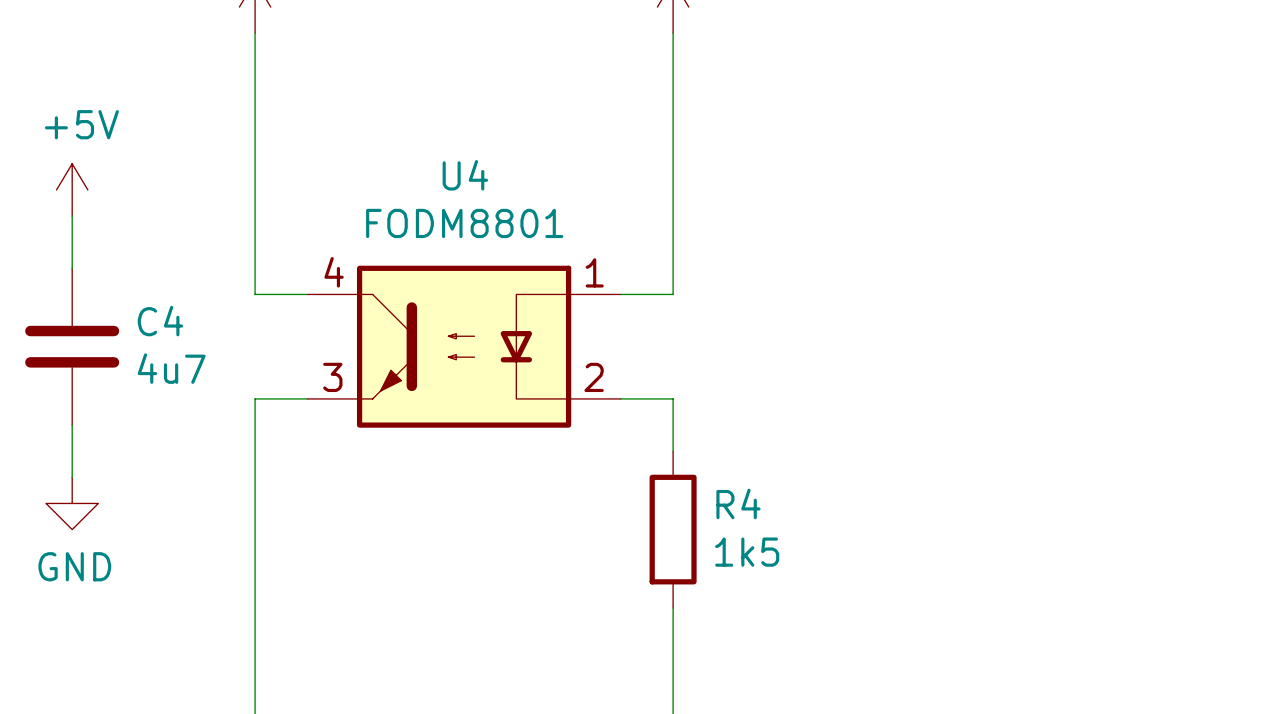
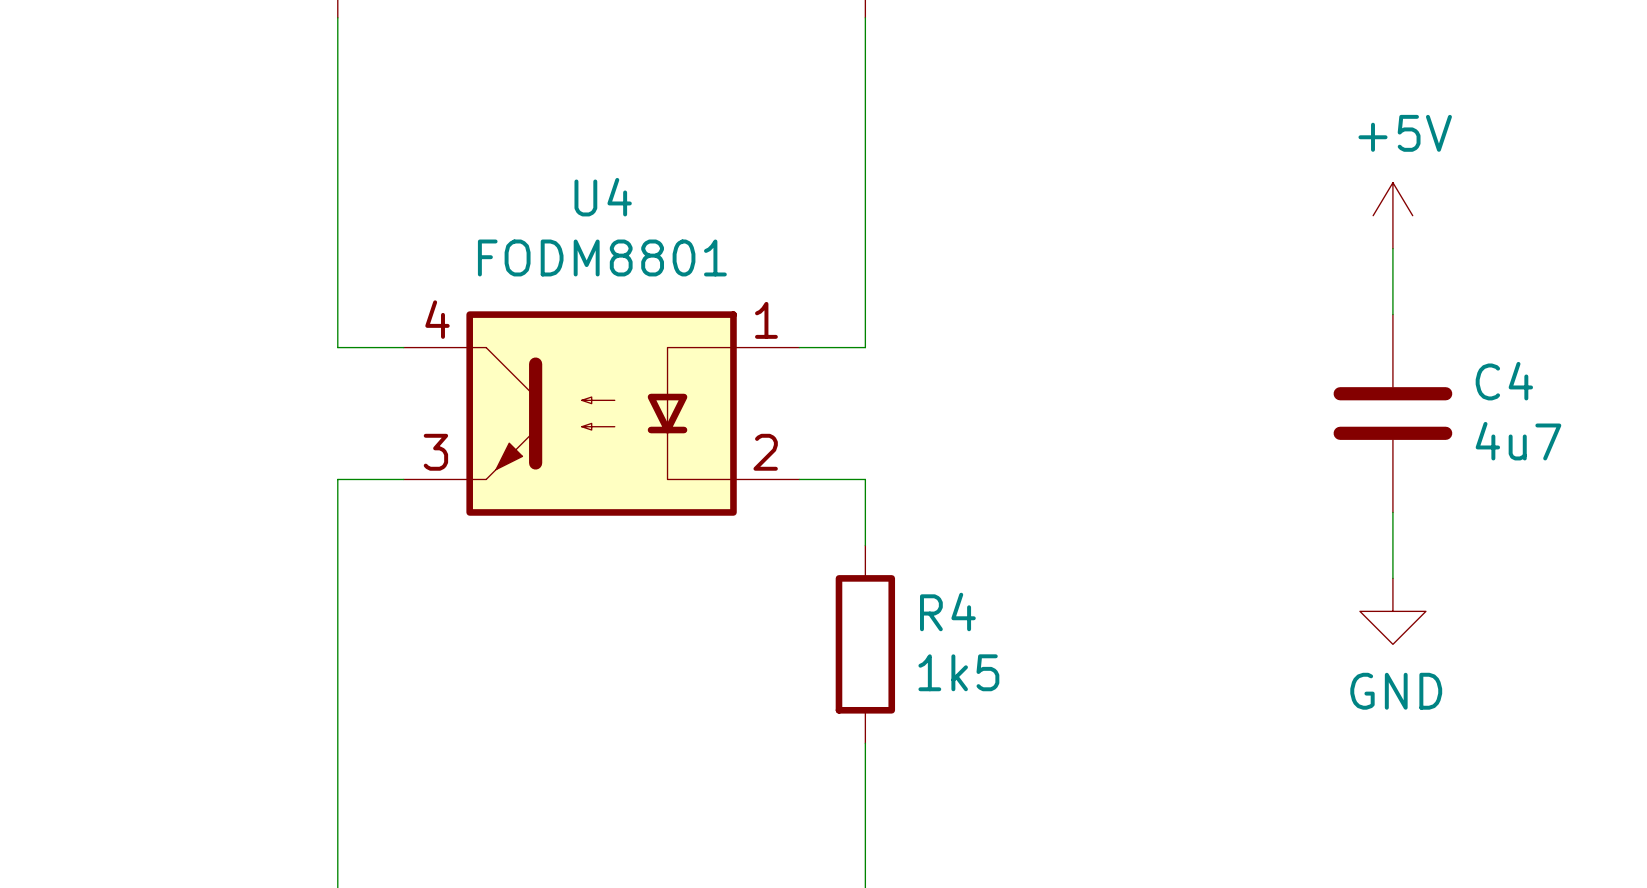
power symbol: +5V (72, 189) -> none
power symbol: none -> +5V (1392, 215)
wire: (72, 216) (72, 268) -> none
wire: none -> (1392, 248) (1392, 314)
C4 position: (72, 346) -> (1392, 413)
wire: (72, 425) (72, 477) -> none
wire: none -> (1392, 512) (1392, 578)
power symbol: GND (72, 503) -> none
power symbol: none -> GND (1392, 611)

